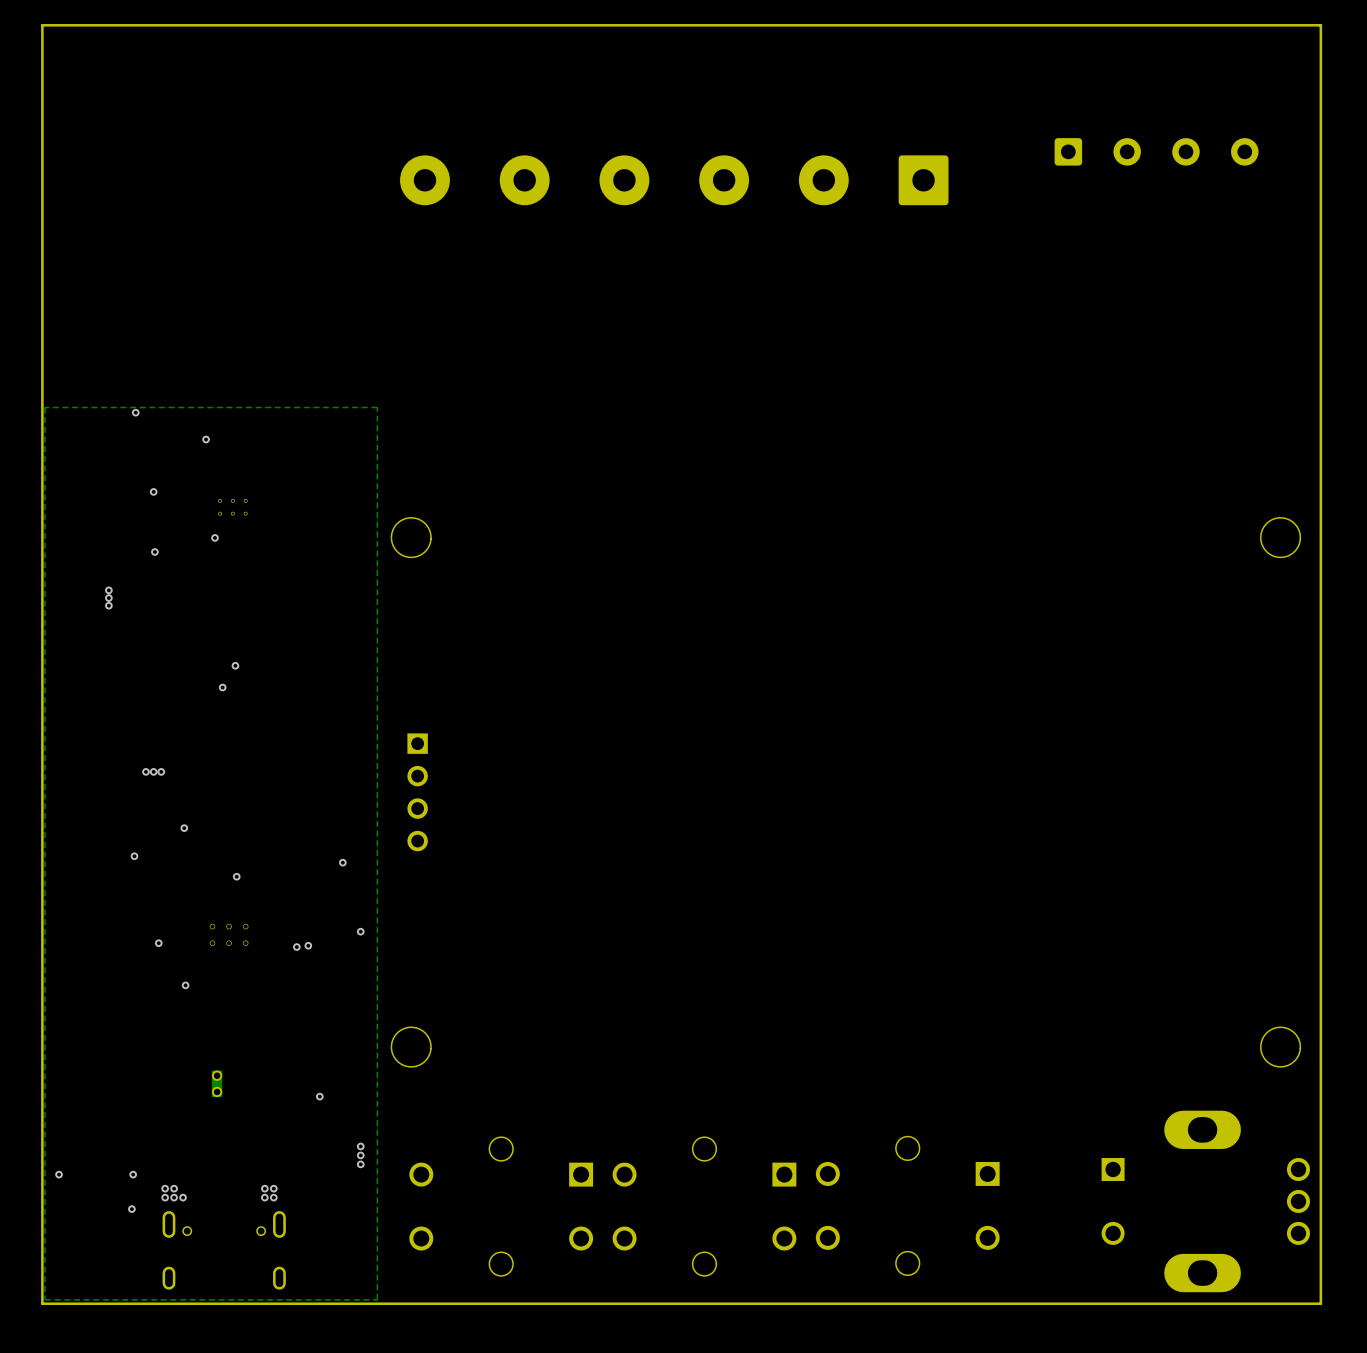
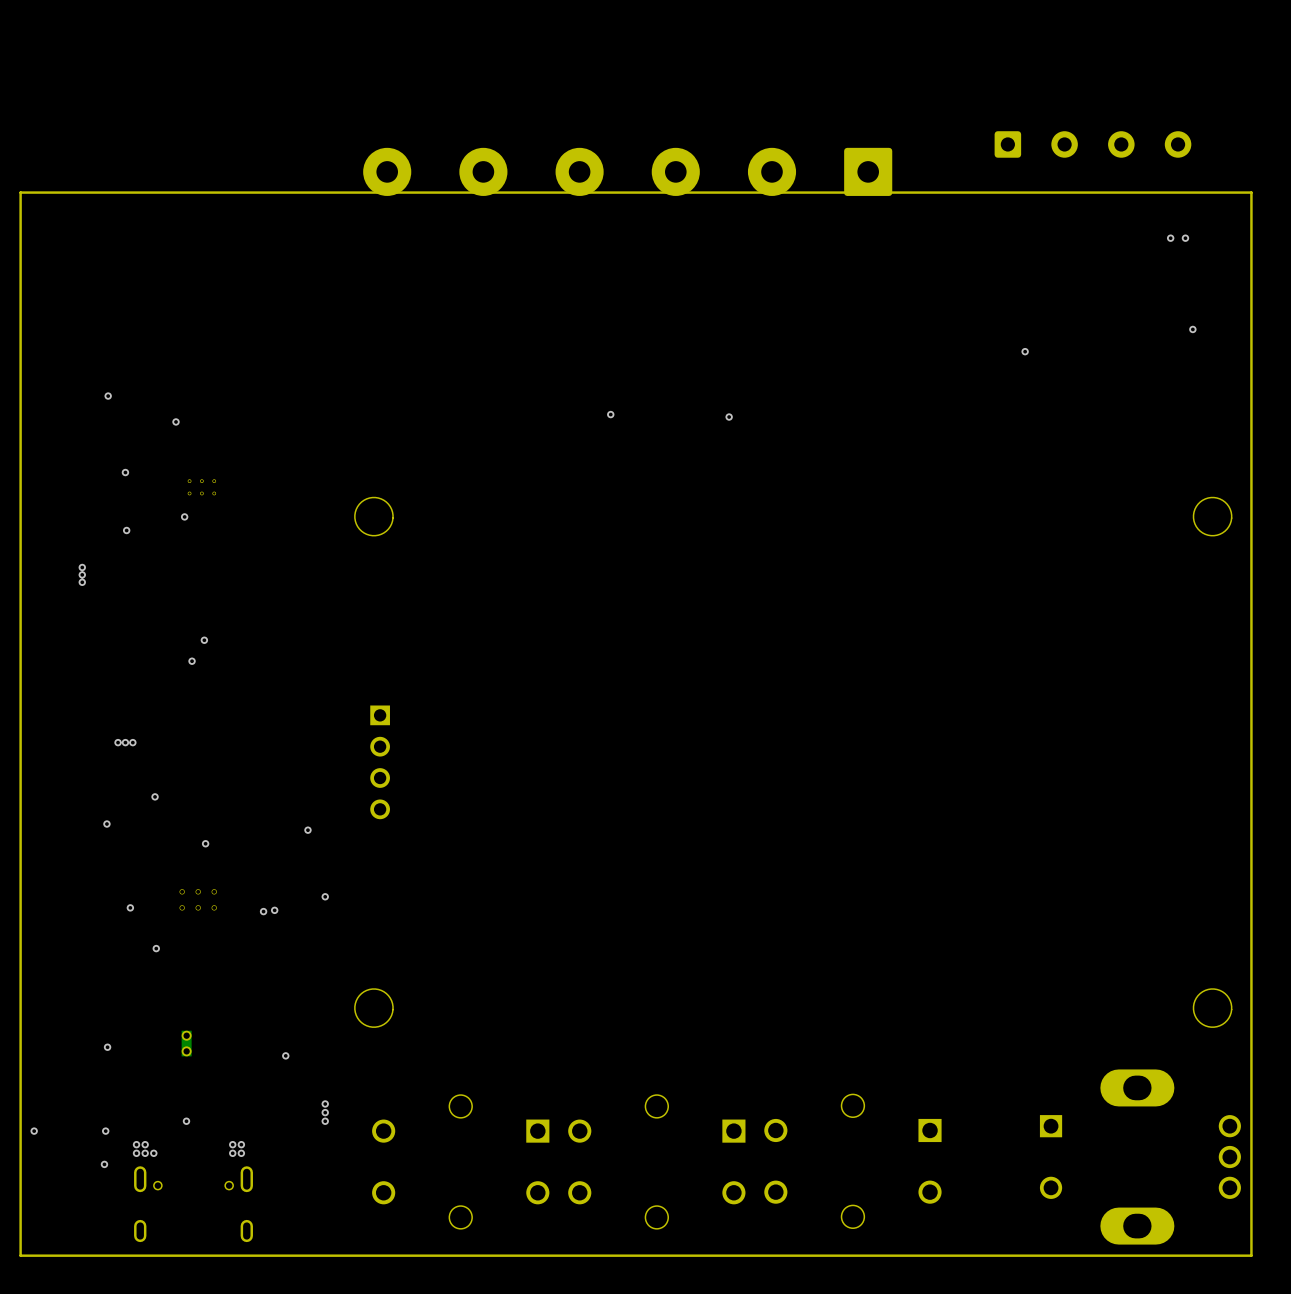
board edge: (1320, 201) (1320, 25) (42, 25) (42, 1303) (44, 1303) -> (1251, 192) (20, 192) (20, 1255)
via: none -> (1170, 238)
via: none -> (1185, 238)
via: none -> (1192, 329)
via: none -> (1025, 351)
zone outline: (377, 407) (44, 407) (44, 1299) (377, 1299) (377, 407) -> none
via: none -> (610, 414)
via: none -> (729, 417)
via: none -> (107, 1047)
via: none -> (186, 1121)

